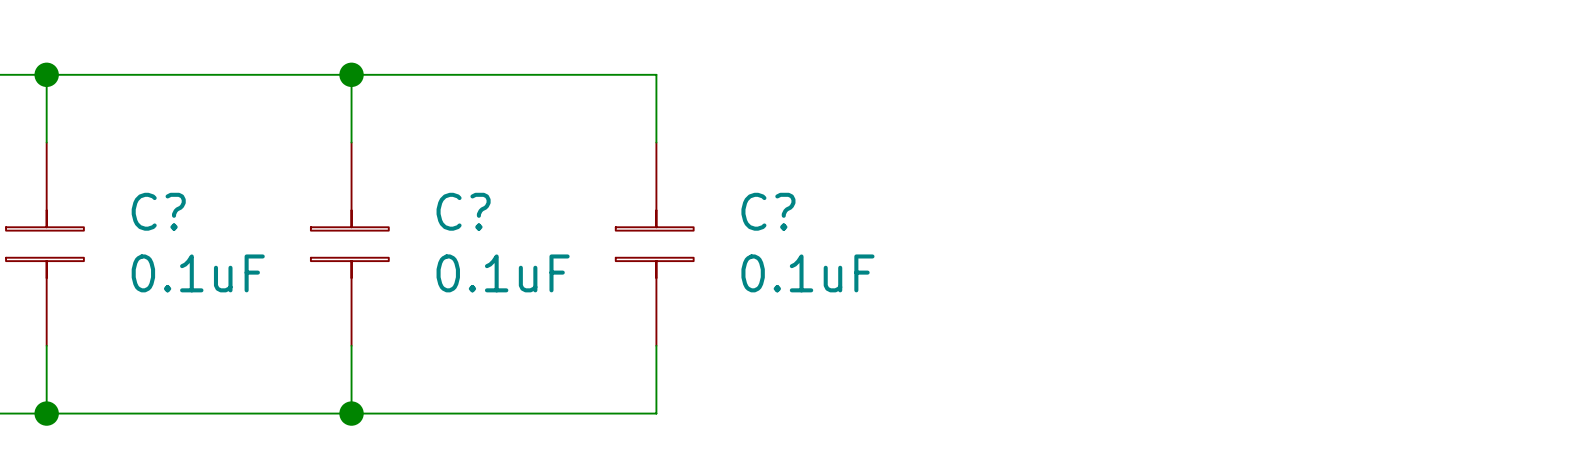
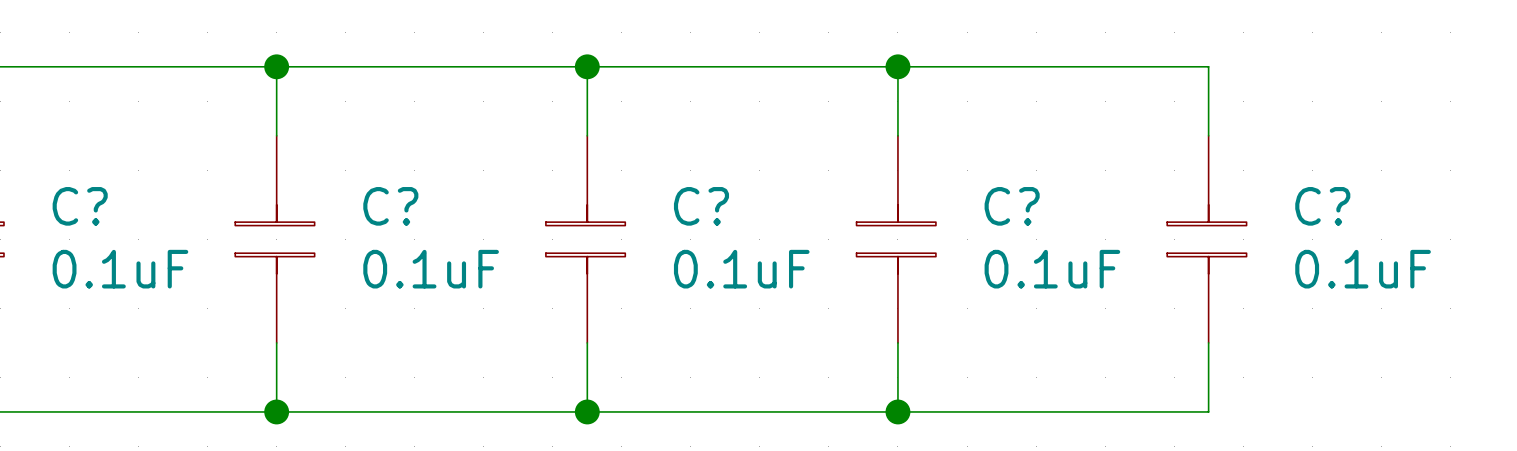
wire: none -> (587, 66) (1208, 66) (1208, 135)
junction: none -> (587, 66)
wire: none -> (897, 66) (897, 135)
junction: none -> (897, 66)
C?: none -> 0.1uF (896, 239)
C?: none -> 0.1uF (1206, 239)
wire: none -> (897, 342) (897, 411)
wire: none -> (1208, 342) (1208, 411) (587, 411)
junction: none -> (587, 411)
junction: none -> (897, 411)

